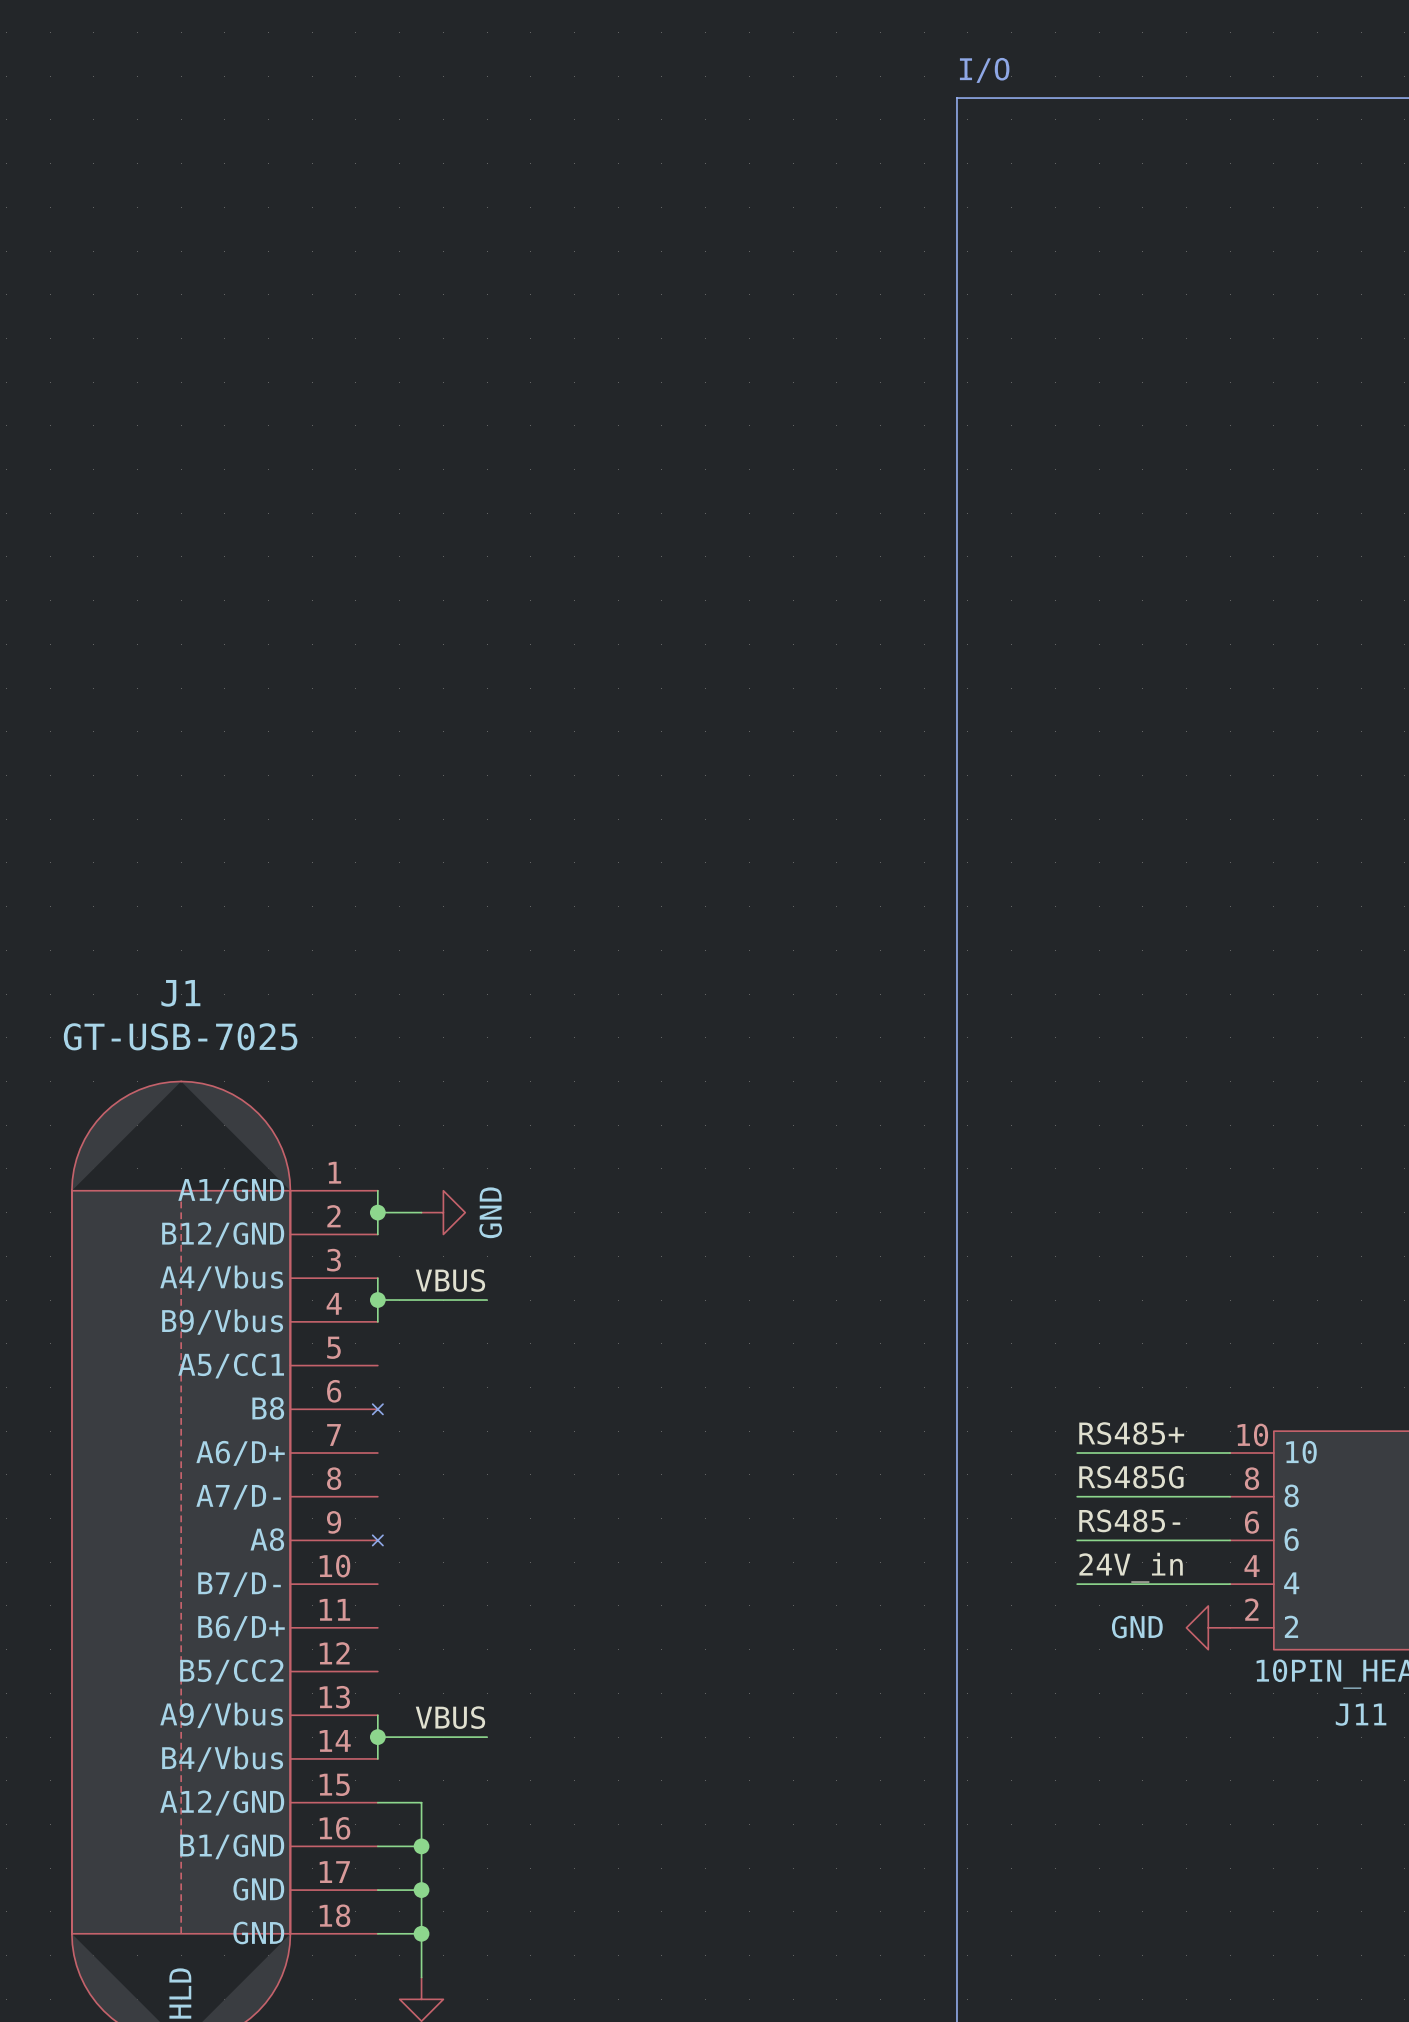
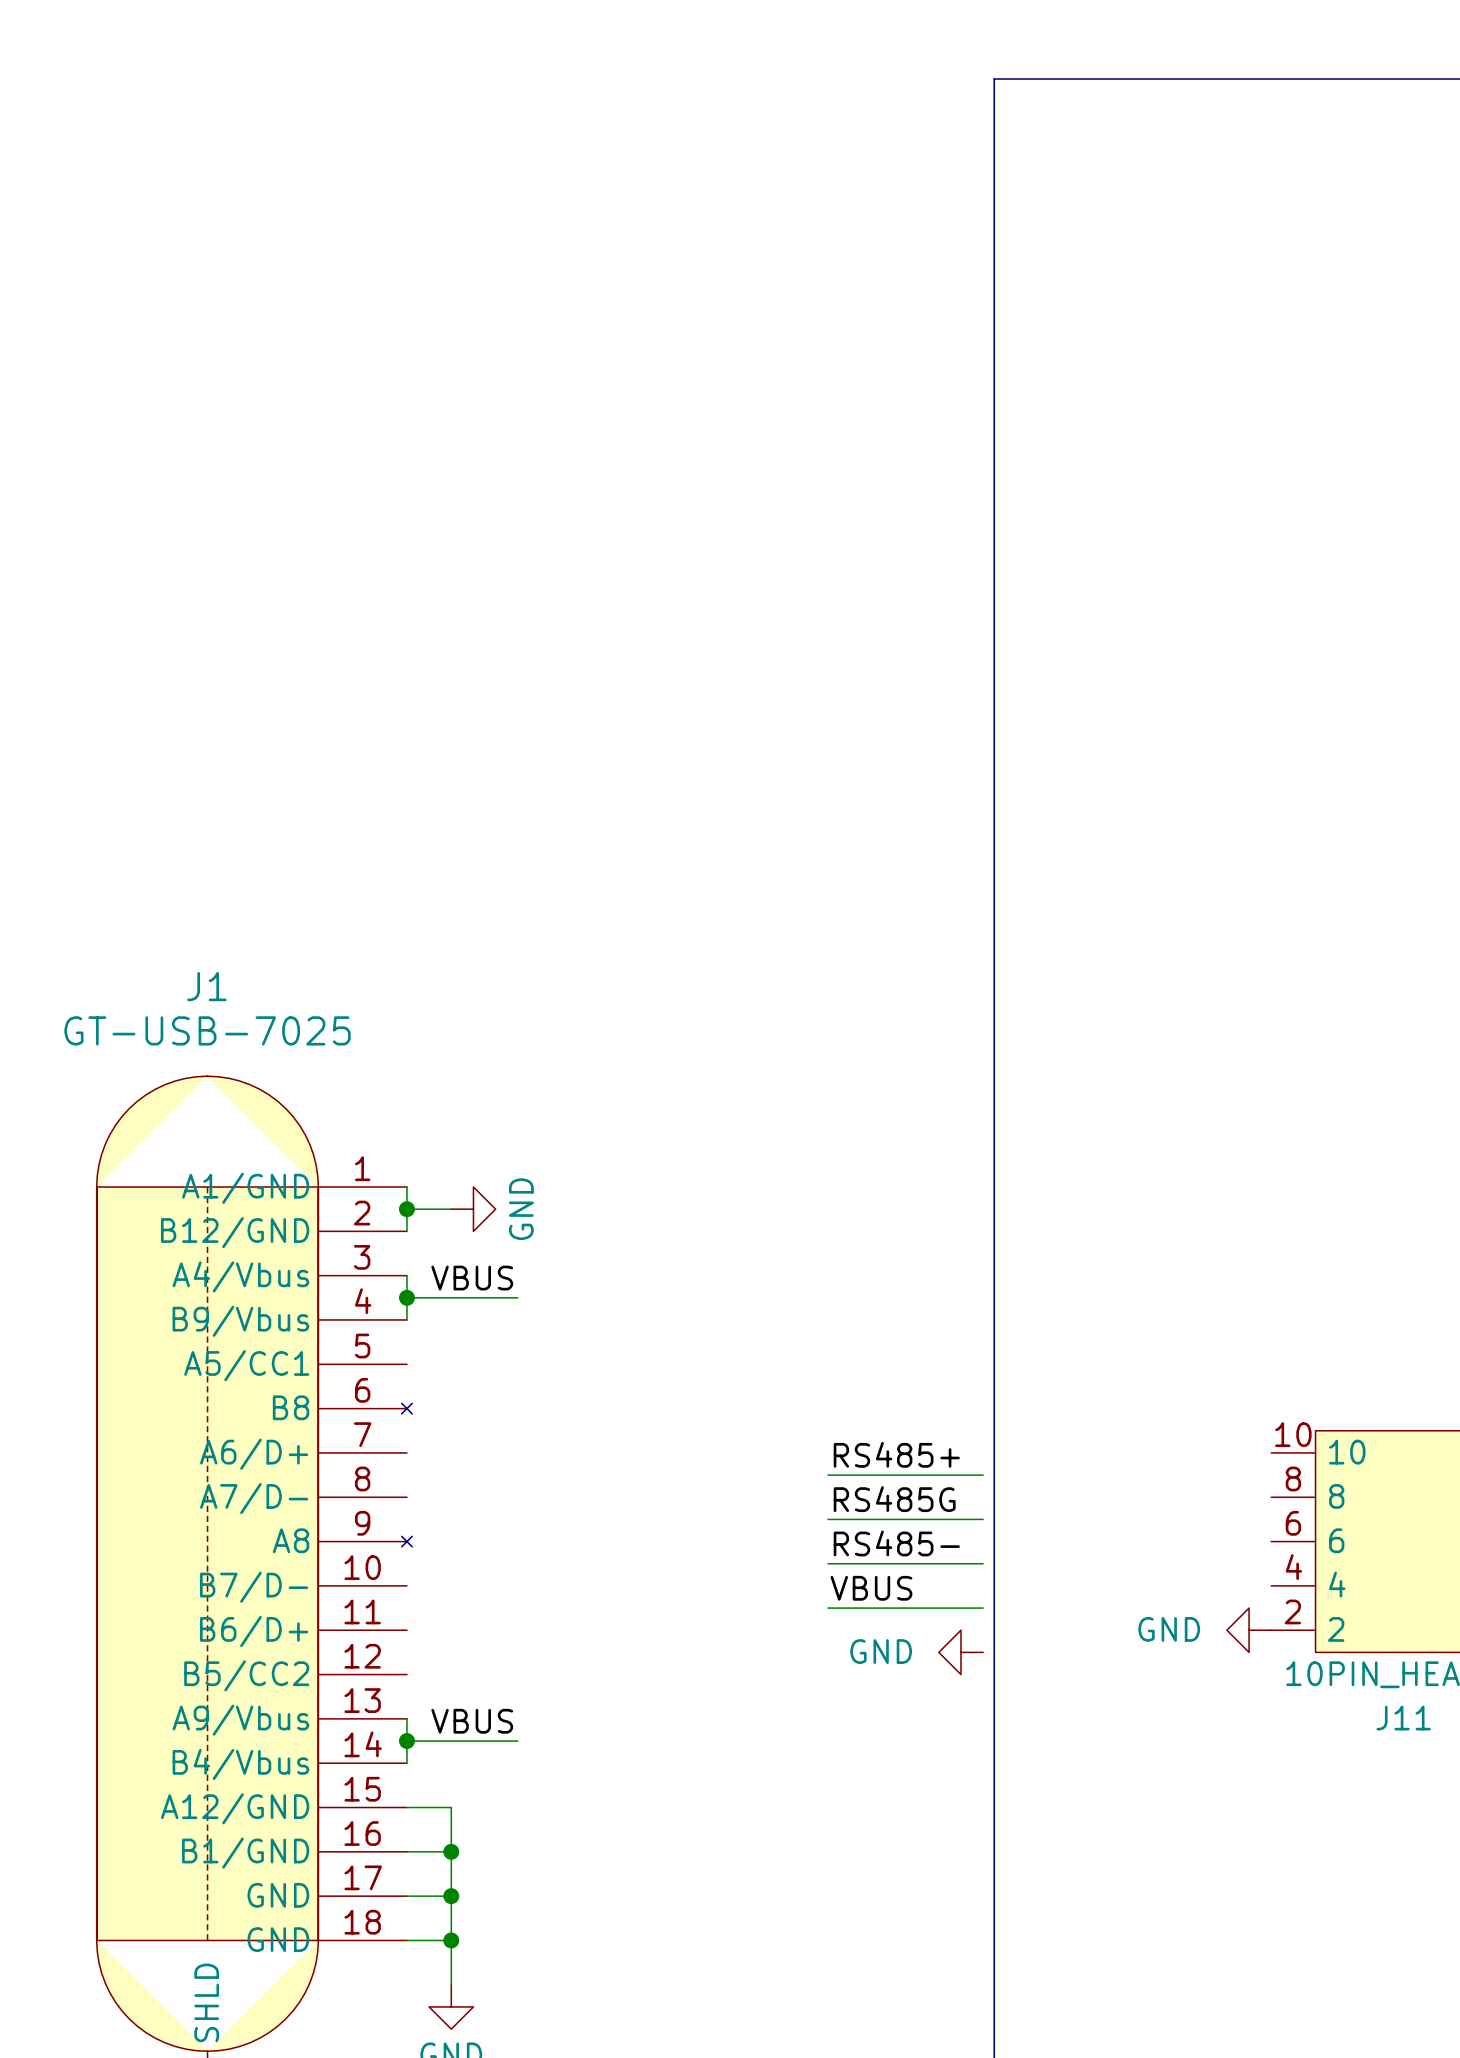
text: I/O (984, 70) -> none
label position: RS485+ (1131, 1433) -> RS485+ (896, 1454)
wire: (1077, 1453) (1230, 1453) -> (828, 1475) (983, 1475)
label position: RS485G (1131, 1477) -> RS485G (894, 1499)
wire: (1077, 1496) (1230, 1496) -> (828, 1519) (983, 1519)
label position: RS485- (1129, 1520) -> RS485- (896, 1543)
wire: (1077, 1540) (1230, 1540) -> (828, 1563) (983, 1563)
label: 24V_in (1131, 1567) -> none
wire: (1077, 1584) (1230, 1584) -> (828, 1608) (983, 1608)
label: none -> VBUS (871, 1588)
power symbol: none -> GND (960, 1652)

